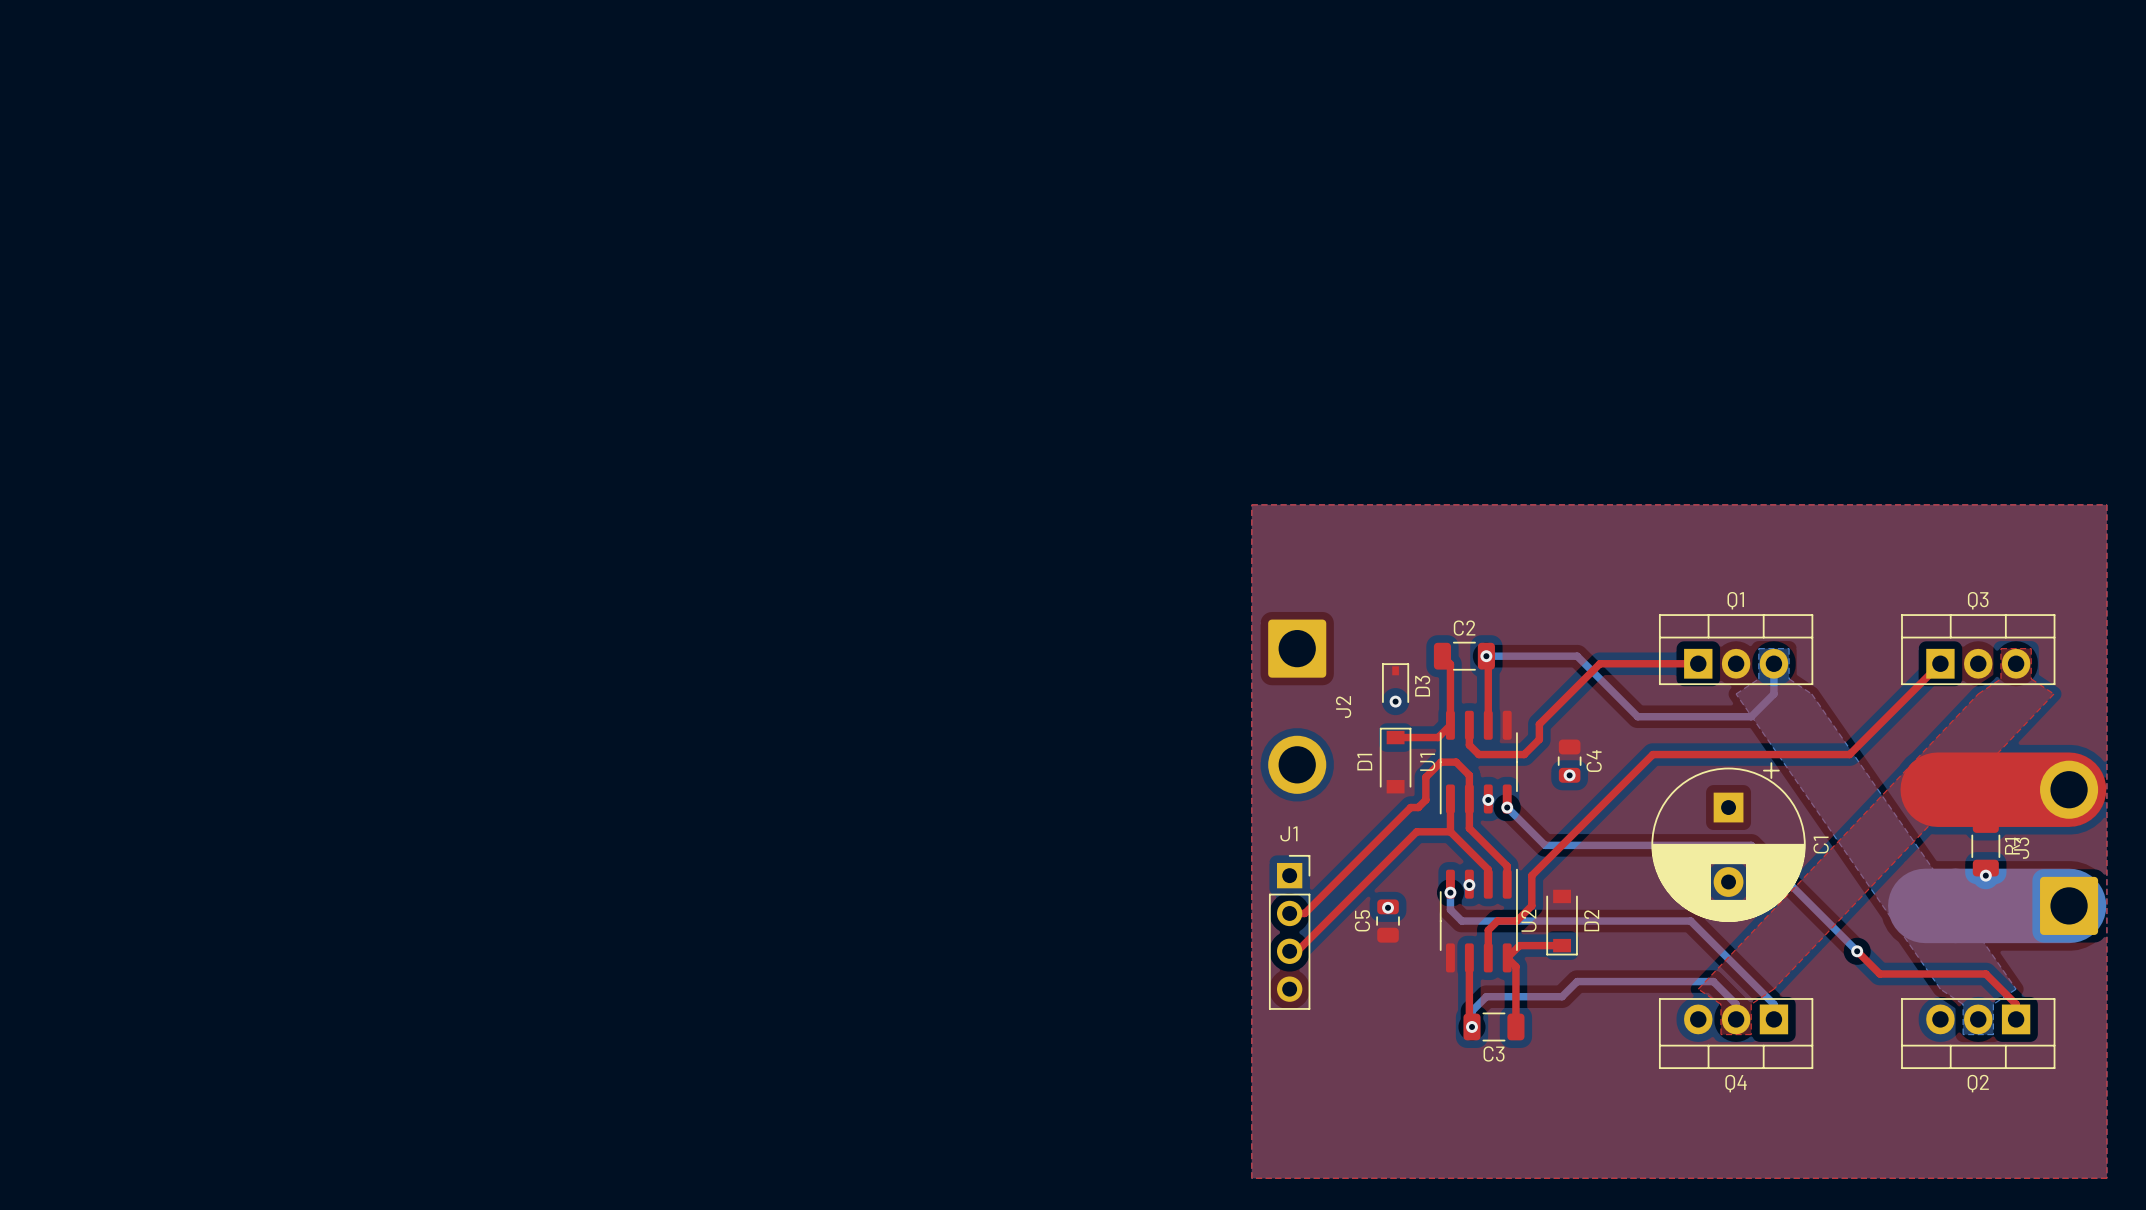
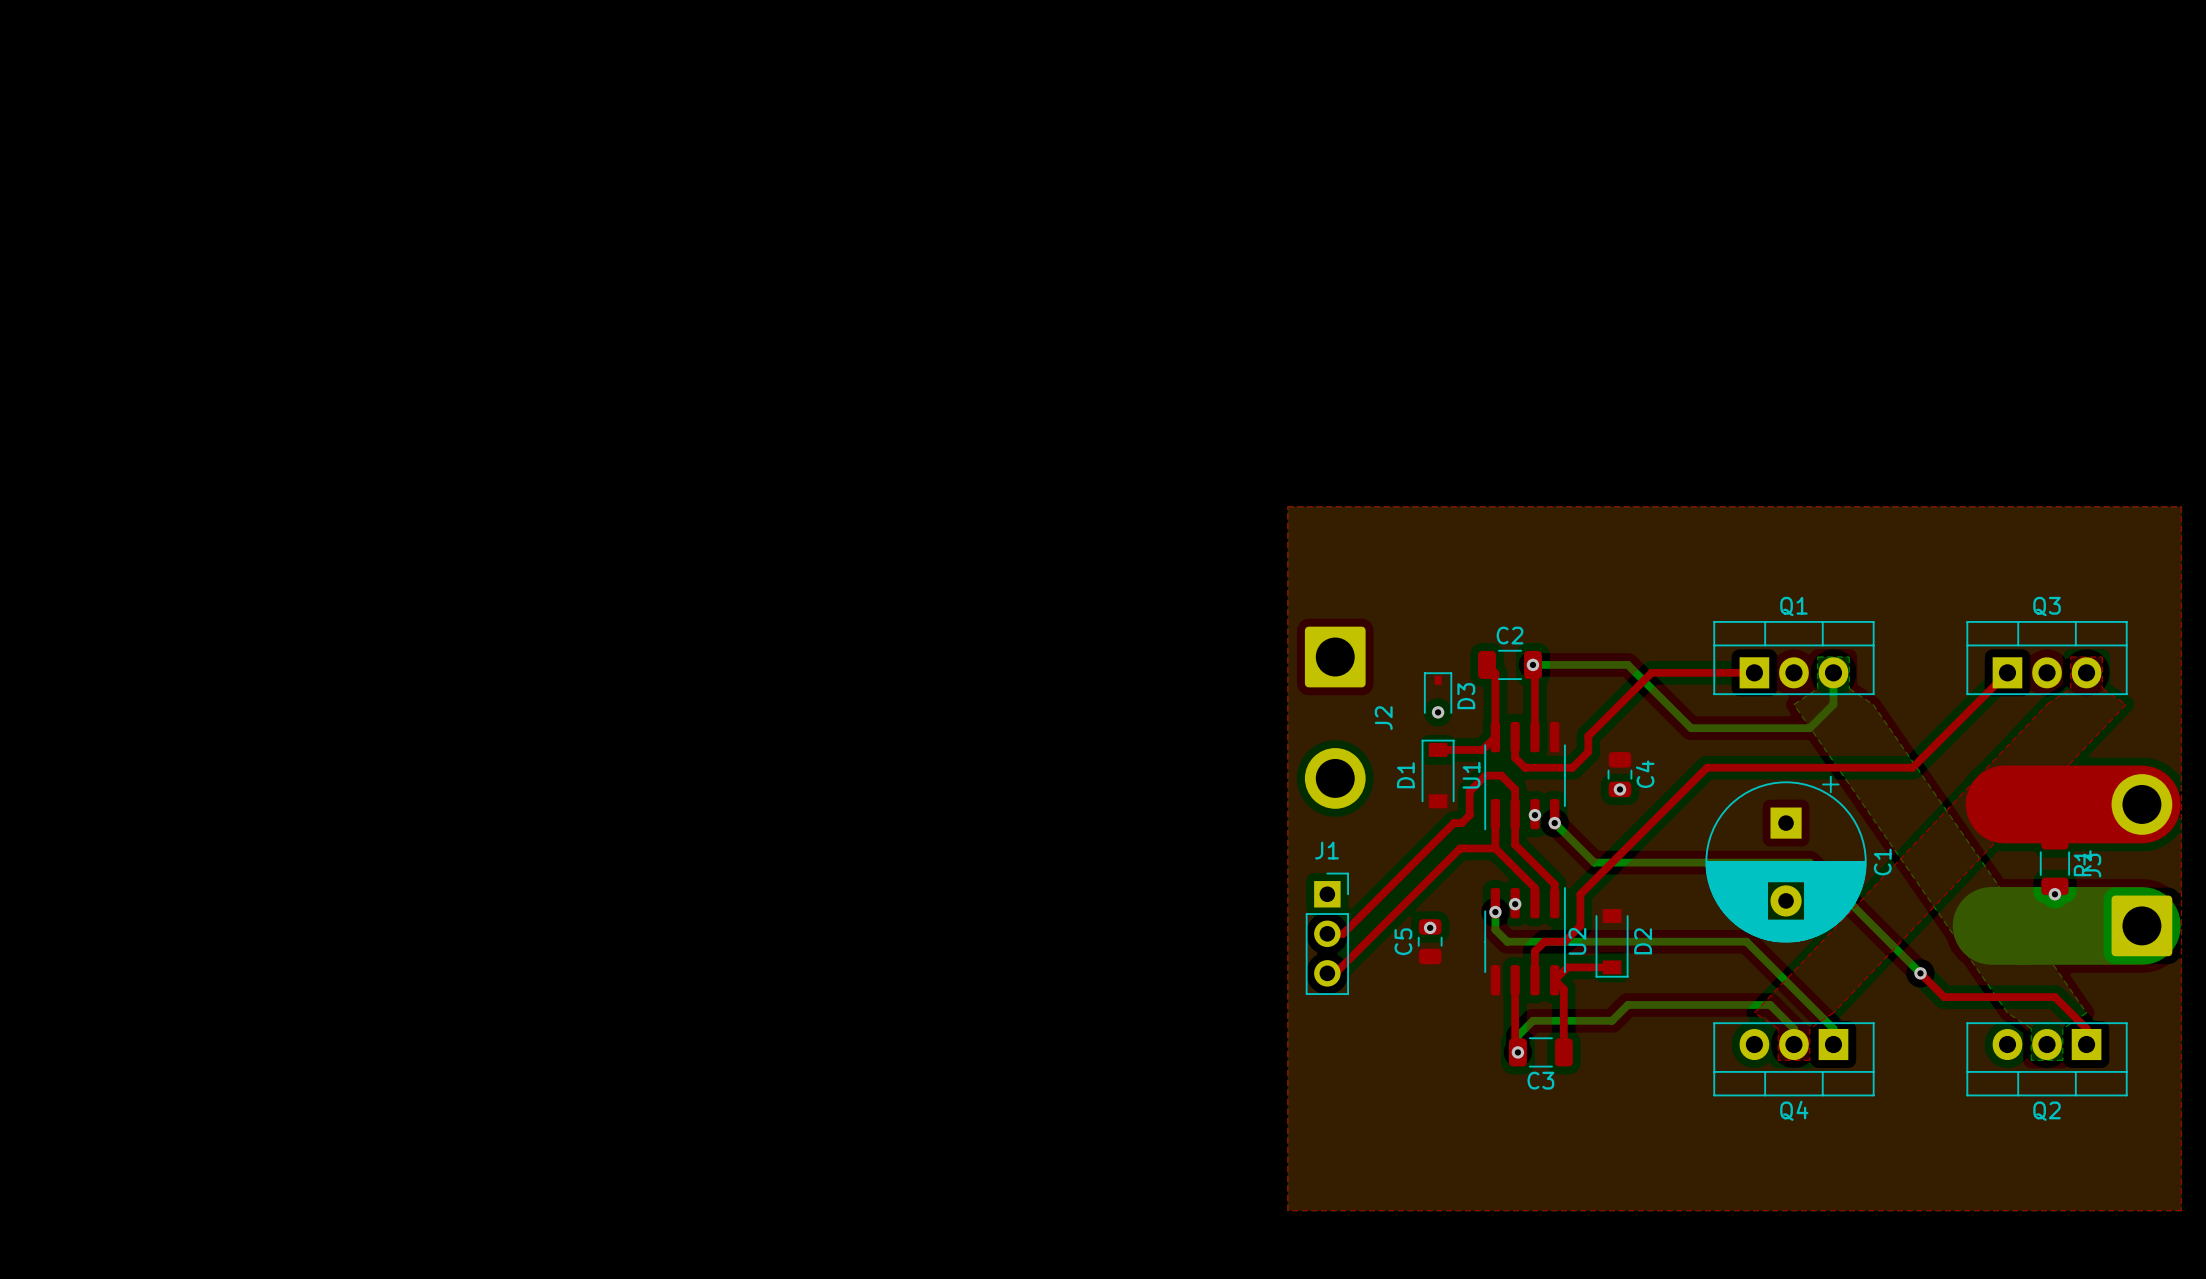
J1 footprint: [1268, 854, 1311, 1010] -> [1305, 872, 1349, 995]

